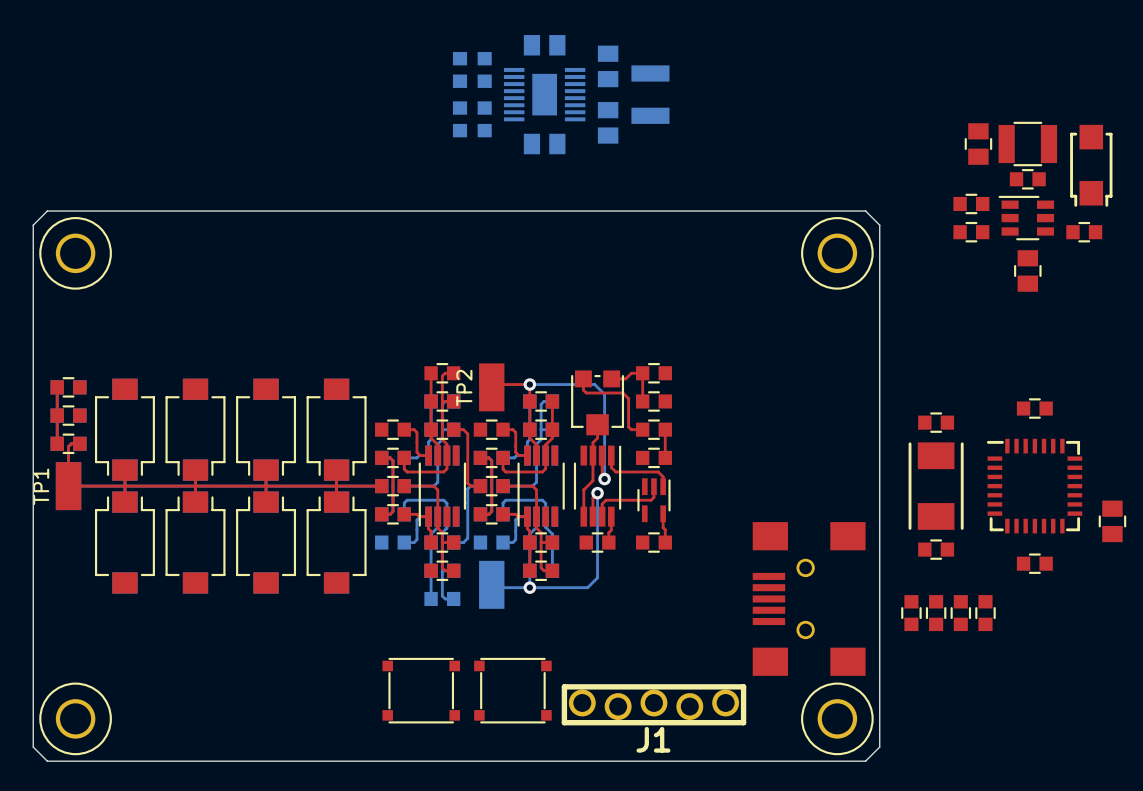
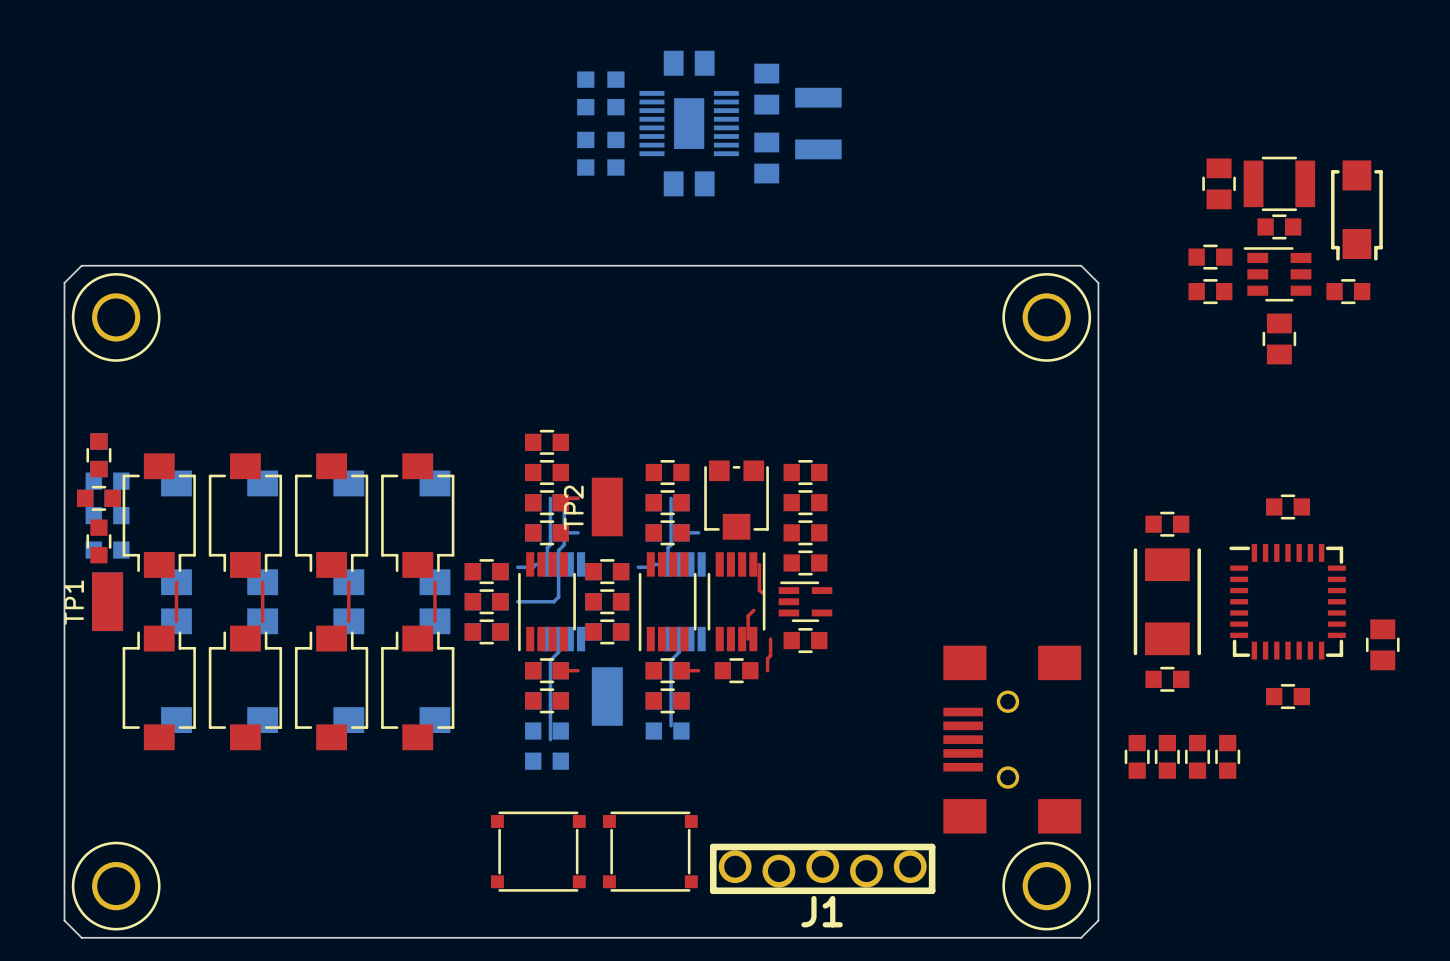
part: none -> (546, 442)
part: none -> (98, 455)
top track: (431, 373) (431, 438) (437, 444) (437, 455) -> none
part: (442, 373) -> none
top track: (453, 373) (445, 373) (442, 376) (442, 439) (446, 444) (446, 468) (443, 472) (407, 472) (404, 469) (404, 457) -> none
part: (653, 373) -> none
top track: (583, 378) (583, 390) (586, 393) (622, 393) (628, 398) (628, 426) (631, 429) (642, 429) -> none
top track: (611, 378) (625, 378) (631, 373) (642, 373) (642, 401) -> none
part: none -> (546, 472)
part: none -> (667, 472)
part: none -> (805, 472)
bottom track: (529, 384) (594, 384) (604, 394) (604, 479) -> none
via: (529, 384) -> none
top track: (57, 387) (57, 443) -> none
part: (68, 387) -> none
top track: (491, 387) (494, 384) (529, 384) (529, 438) (536, 444) (536, 455) -> none
TP2 position: (491, 387) -> (607, 506)
part: none -> (98, 498)
part: (442, 401) -> none
part: (541, 401) -> none
top track: (552, 401) (552, 438) (545, 444) (545, 468) (542, 472) (505, 472) (503, 469) (503, 457) -> none
bottom track: (552, 401) (543, 401) (541, 404) (541, 439) (536, 444) (536, 482) (532, 486) (503, 486) -> none
part: (653, 401) -> none
part position: (597, 402) -> (736, 500)
part: none -> (546, 502)
part: none -> (667, 502)
part: none -> (805, 502)
part: (68, 415) -> none
top track: (597, 424) (597, 438) (592, 442) (592, 480) (583, 489) (583, 516) -> none
part position: (124, 429) -> (159, 515)
part position: (195, 429) -> (245, 515)
part position: (266, 429) -> (331, 515)
part position: (336, 429) -> (417, 515)
part: (393, 429) -> none
top track: (404, 429) (414, 429) (416, 432) (416, 452) (420, 455) (428, 455) -> none
part: none -> (546, 532)
part: (442, 429) -> none
top track: (453, 429) (463, 429) (467, 433) (467, 483) (470, 486) (480, 486) -> none
part: (491, 429) -> none
top track: (503, 429) (512, 429) (515, 432) (515, 452) (519, 455) (527, 455) -> none
part: none -> (667, 532)
part: (541, 429) -> none
part position: (653, 429) -> (805, 532)
top track: (665, 429) (665, 457) -> none
part rotation: 0° (68, 443) -> 90° clockwise (98, 541)
top track: (79, 443) (71, 443) (68, 446) (68, 486) (381, 486) -> none
top track: (611, 455) (611, 467) (615, 472) (658, 472) (663, 476) (663, 486) -> none
top track: (381, 457) (390, 457) (393, 460) (393, 511) (390, 514) (381, 514) -> none
part: (393, 457) -> none
top track: (480, 457) (488, 457) (491, 460) (491, 511) (488, 514) (480, 514) -> none
part: (491, 457) -> none
part position: (653, 457) -> (805, 562)
part: none -> (486, 571)
part: none -> (607, 571)
via: (604, 479) -> none
part: none -> (486, 601)
part: (393, 486) -> none
top track: (404, 486) (433, 486) (437, 489) (437, 528) (442, 532) (442, 567) (445, 570) (453, 570) -> none
part position: (442, 486) -> (546, 601)
part: none -> (607, 601)
bottom track: (480, 486) (470, 486) (467, 488) (467, 538) (463, 542) (453, 542) -> none
part: (491, 486) -> none
top track: (503, 486) (532, 486) (536, 489) (536, 528) (541, 532) (541, 567) (543, 570) (552, 570) -> none
part position: (541, 486) -> (667, 601)
part position: (597, 486) -> (736, 601)
top track: (653, 486) (653, 497) (651, 500) (606, 500) (602, 504) (602, 516) -> none
bottom track: (597, 493) (597, 577) (587, 587) (494, 587) (491, 584) -> none
via: (597, 493) -> none
part rotation: 0° (653, 500) -> 90° counterclockwise (805, 601)
part: none -> (486, 631)
part: none -> (607, 631)
top track: (663, 513) (665, 542) -> none
part: (393, 514) -> none
top track: (404, 514) (428, 516) (431, 542) -> none
bottom track: (404, 514) (404, 503) (407, 500) (443, 500) (446, 503) (446, 528) (442, 532) (442, 596) (445, 598) (453, 598) -> none
part: (491, 514) -> none
top track: (503, 514) (527, 516) (527, 528) (529, 531) (529, 570) -> none
bottom track: (503, 514) (503, 503) (505, 500) (542, 500) (545, 503) (545, 527) (552, 534) (552, 570) -> none
bottom track: (428, 516) (420, 516) (416, 519) (416, 539) (414, 542) (404, 542) -> none
bottom track: (527, 516) (519, 516) (515, 519) (515, 539) (512, 542) (503, 542) -> none
part position: (124, 542) -> (159, 687)
part position: (195, 542) -> (245, 687)
part position: (266, 542) -> (331, 687)
part position: (336, 542) -> (417, 687)
part: (393, 542) -> none
part: none -> (546, 670)
part: (442, 542) -> none
part: (491, 542) -> none
part: none -> (667, 670)
part: (541, 542) -> none
part position: (597, 542) -> (736, 670)
part position: (653, 542) -> (805, 640)
part: none -> (546, 700)
part: none -> (667, 700)
part: (442, 570) -> none
part: (541, 570) -> none
part position: (491, 584) -> (607, 696)
via: (529, 587) -> none
part: none -> (546, 731)
part: none -> (667, 731)
part: (442, 598) -> none
part: none -> (546, 761)

